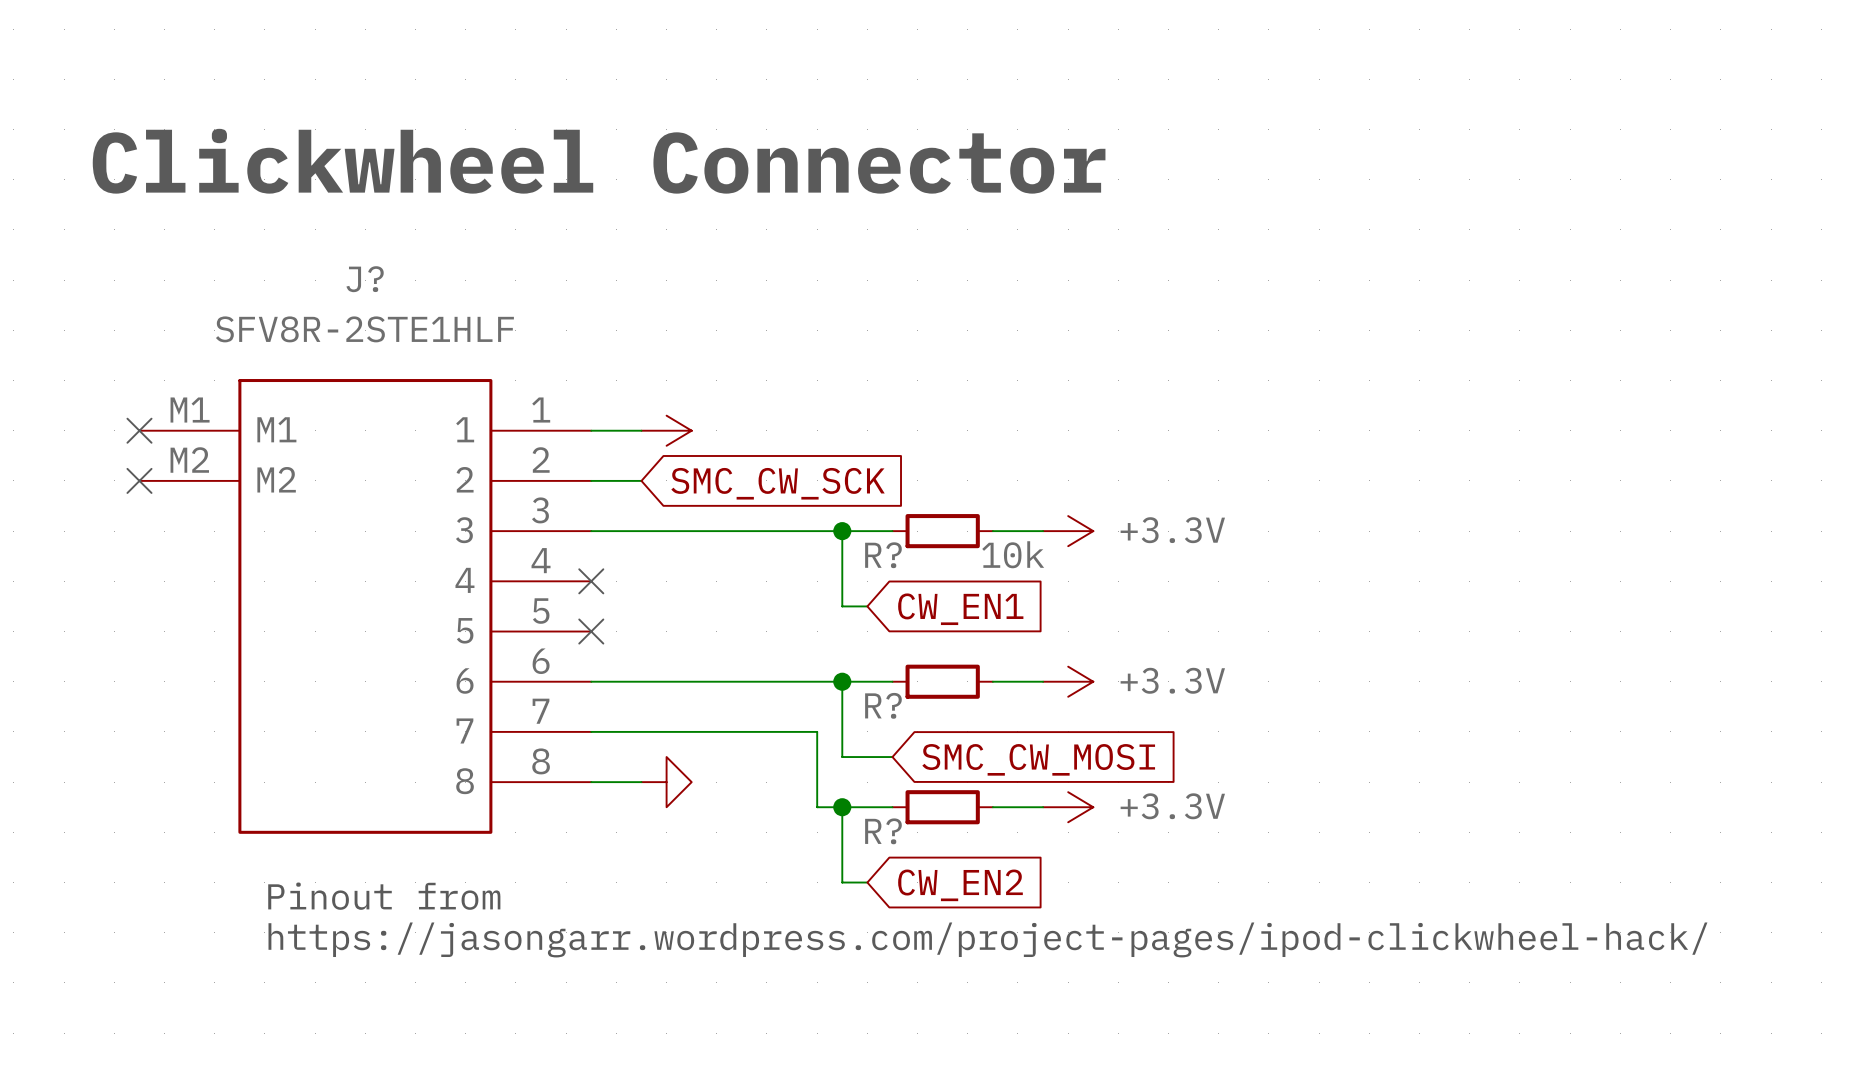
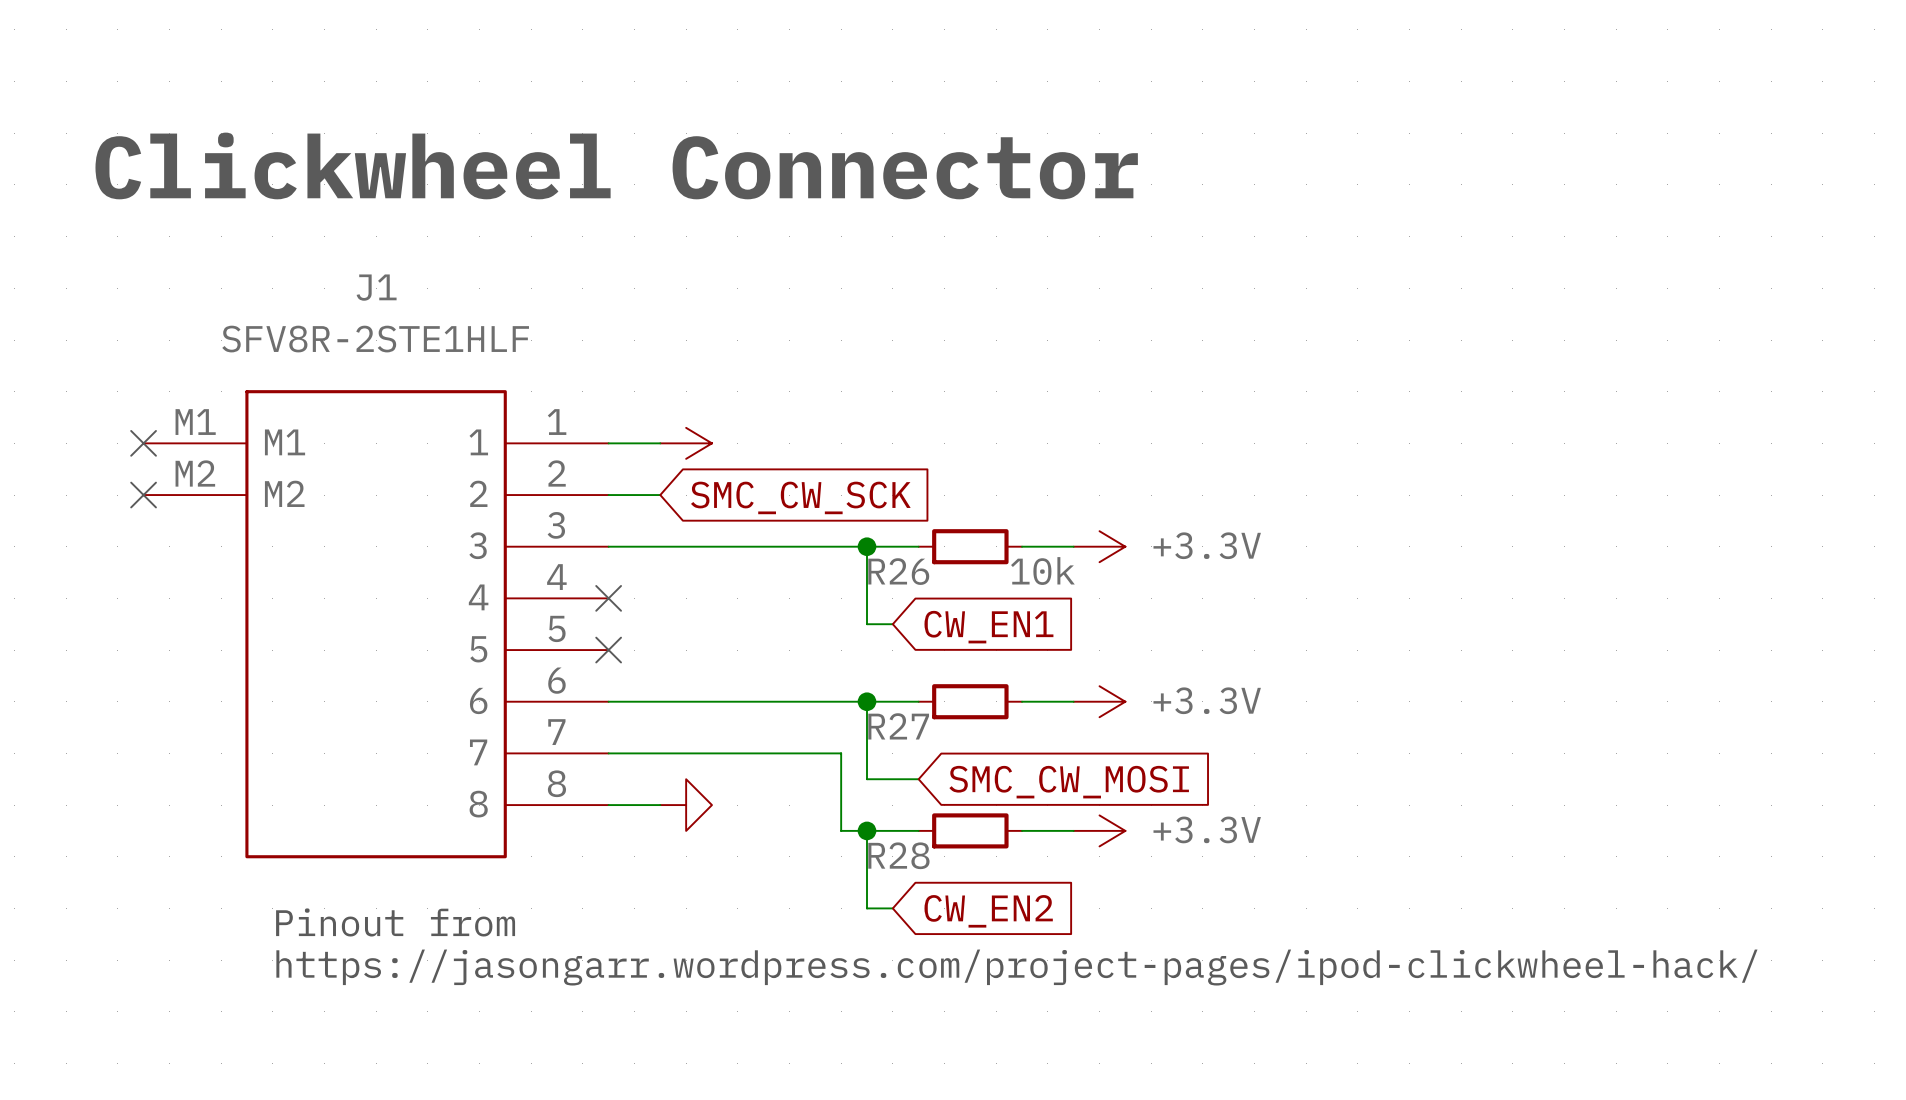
J? name: J? (365, 279) -> J1 (376, 287)
R? name: R? (883, 555) -> R26 (898, 571)
R? name: R? (883, 705) -> R27 (898, 726)
R? name: R? (883, 831) -> R28 (898, 855)

